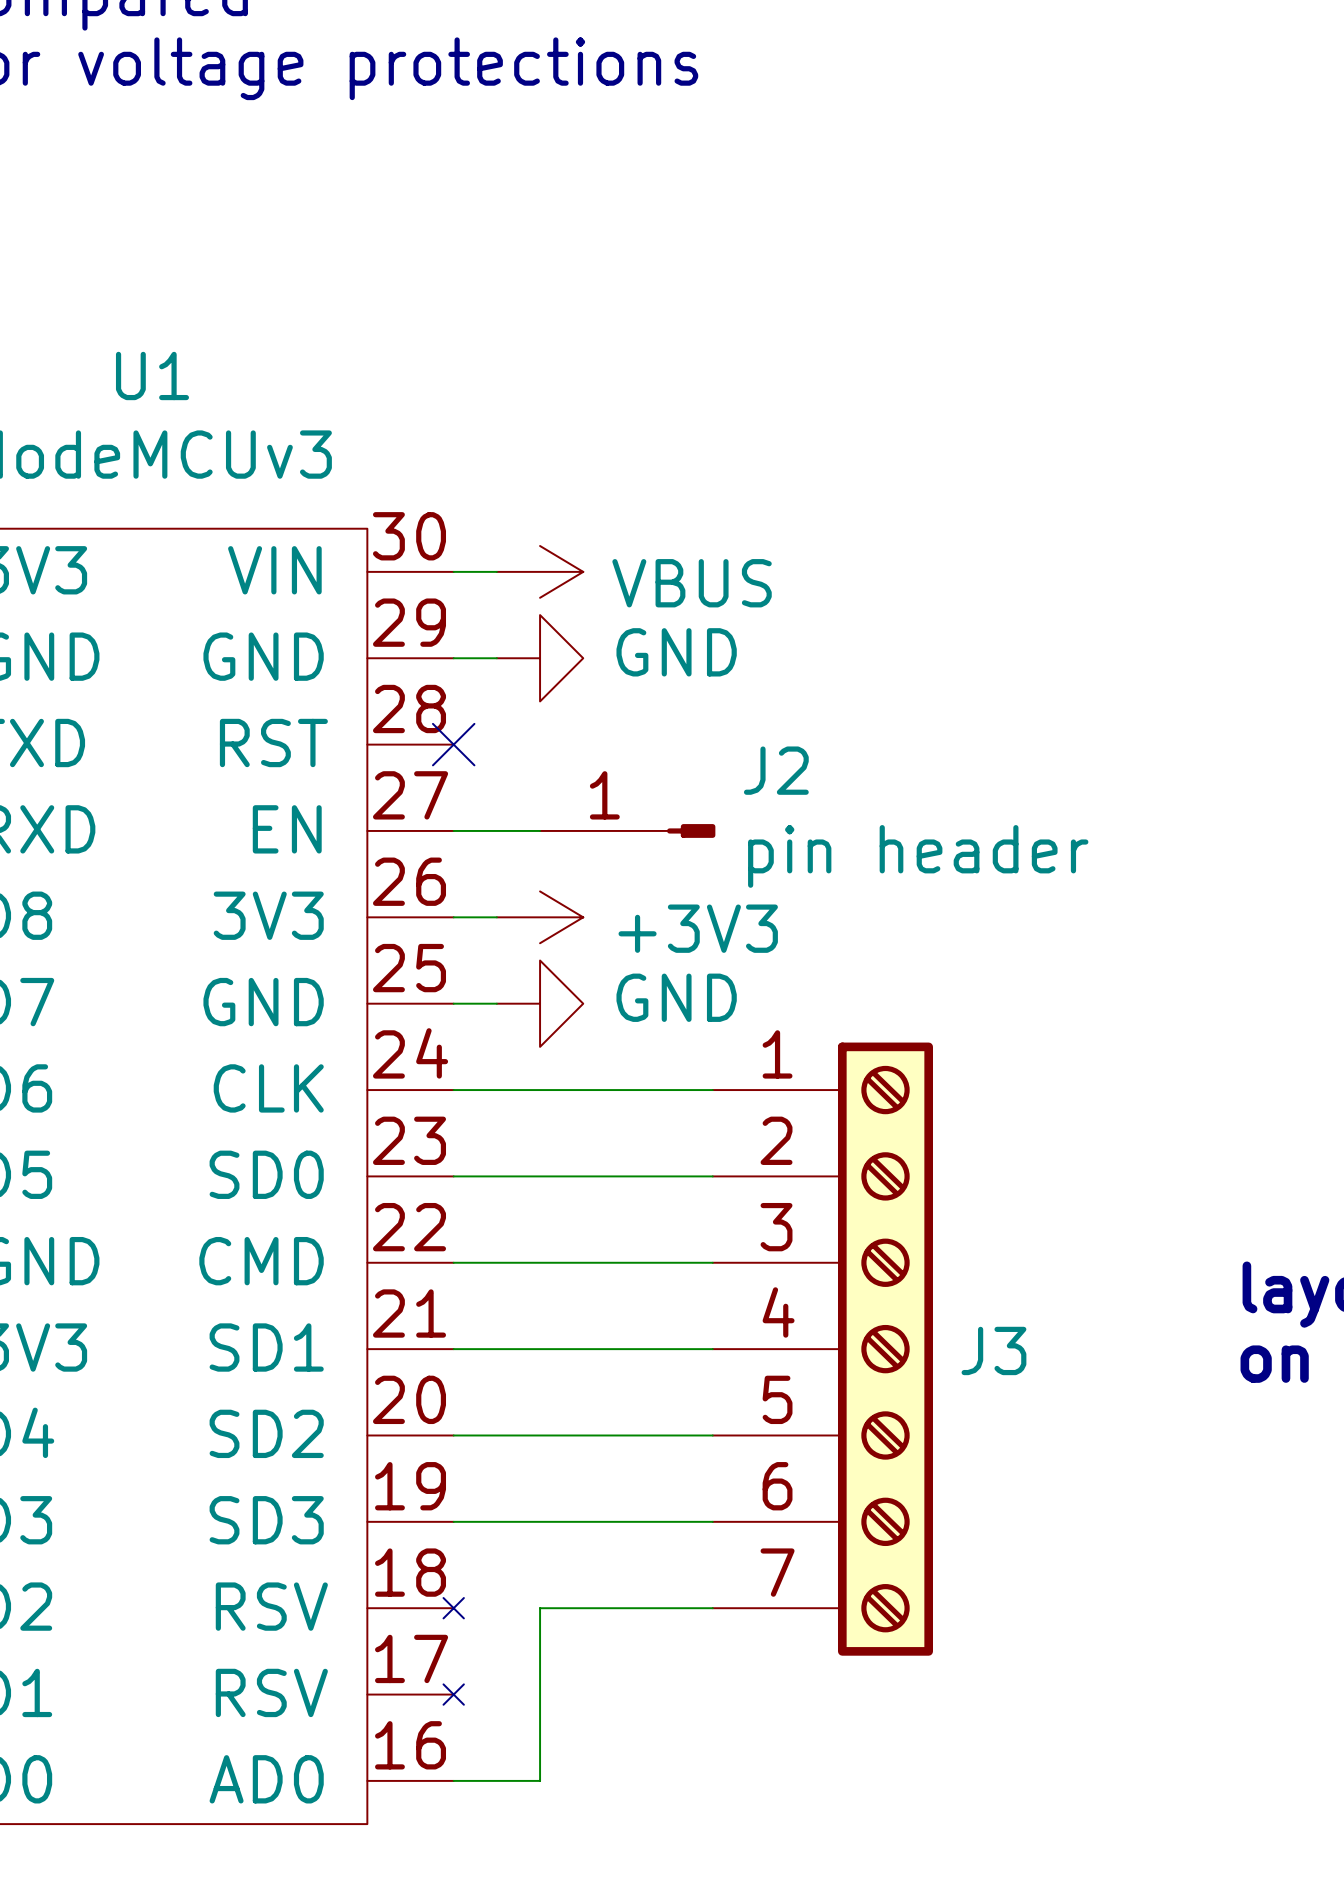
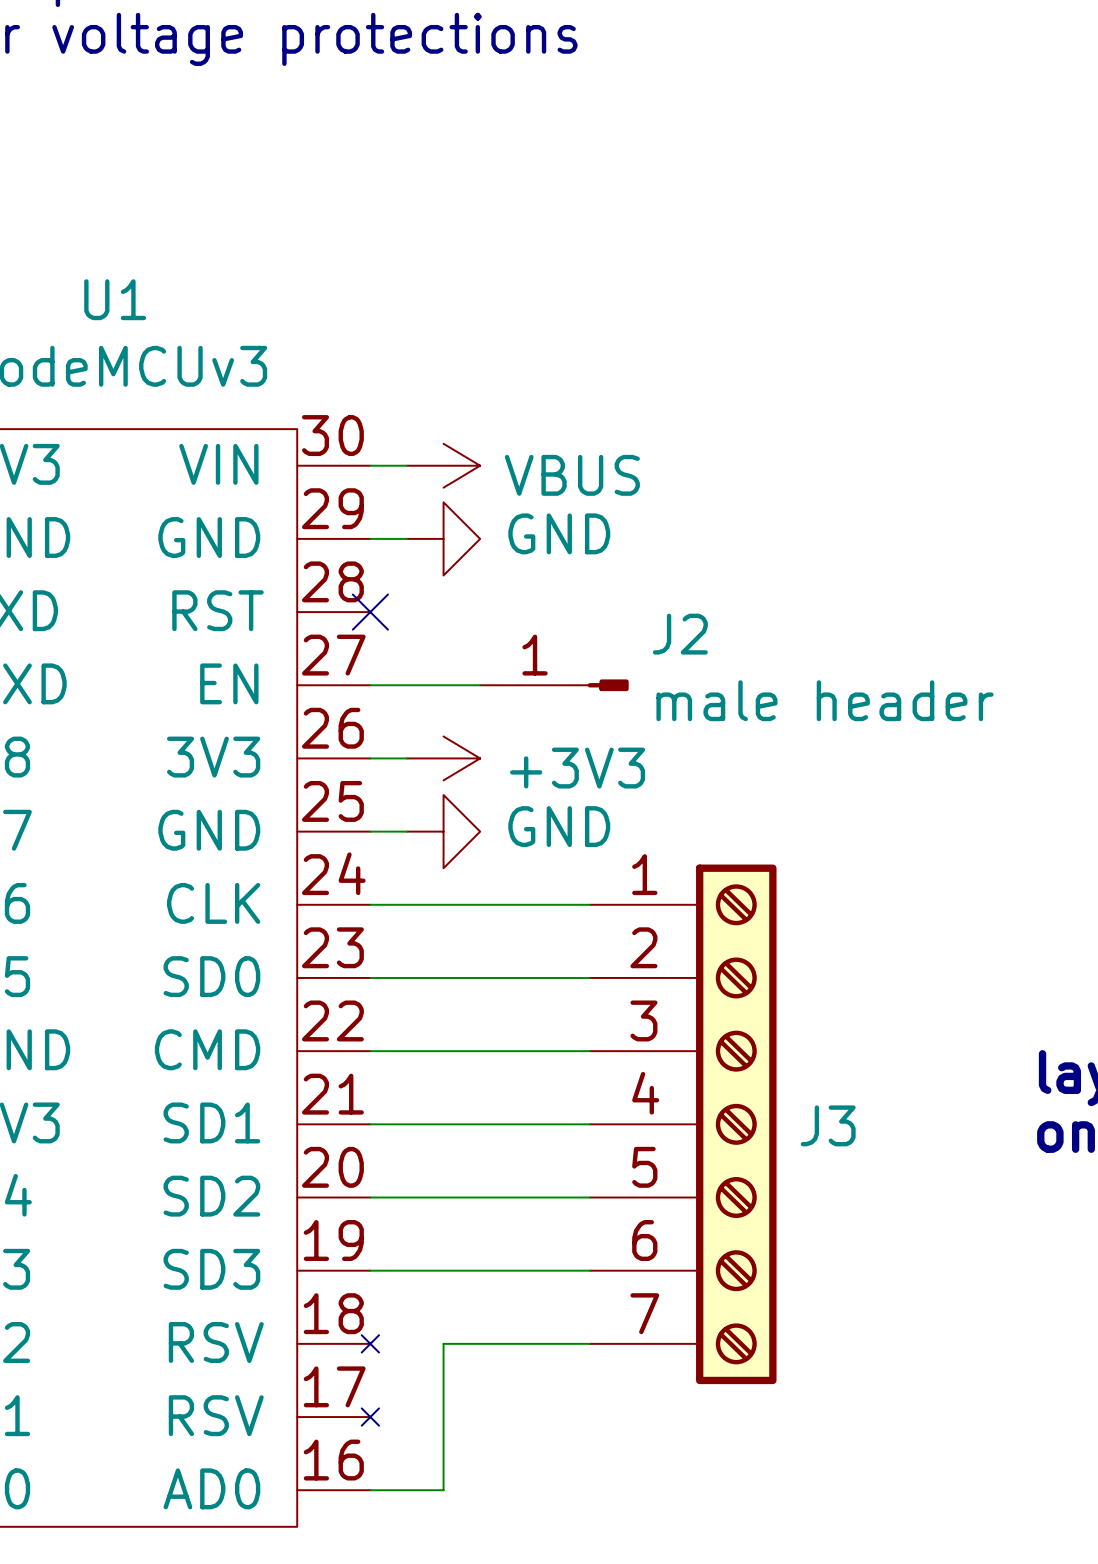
J2 position: (627, 830) -> (554, 685)
J2 value: pin header (918, 856) -> male header (824, 700)

